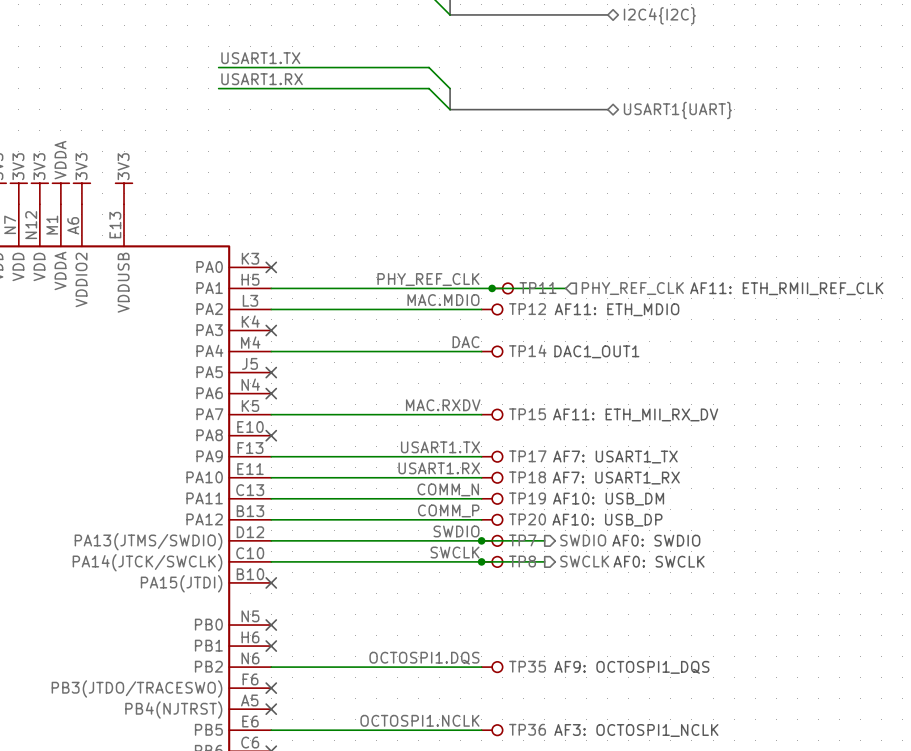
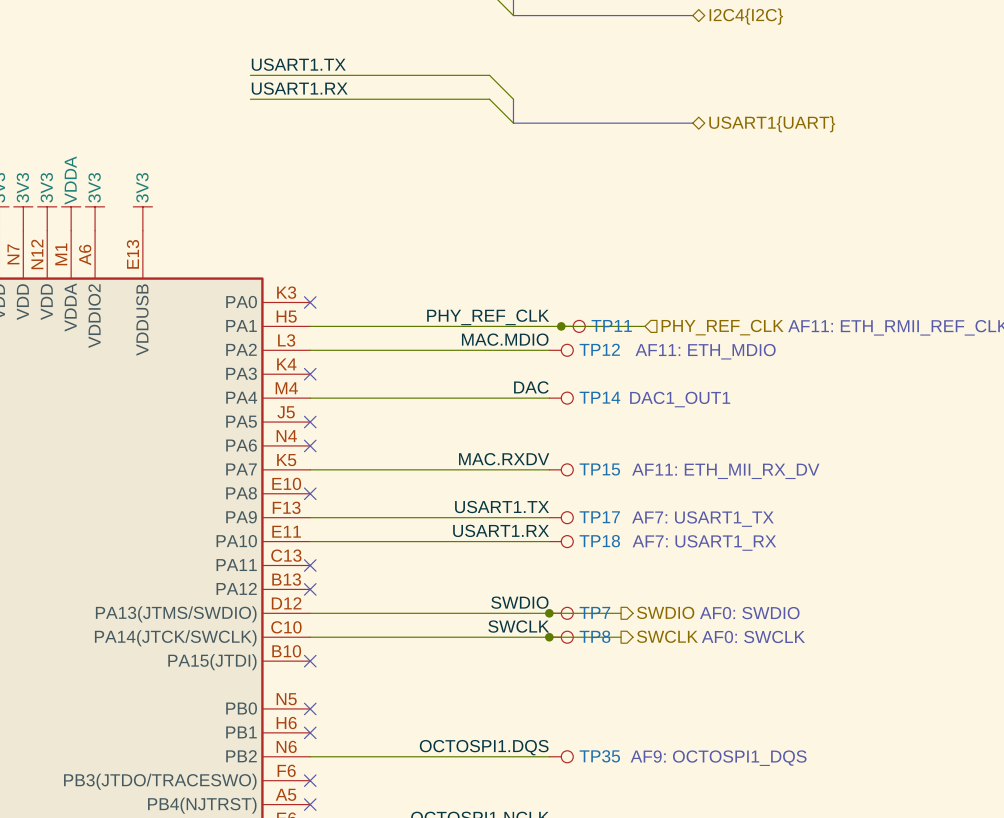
label: COMM_N (448, 489) -> none
wire: (271, 498) (481, 498) -> none
no-connect mark: none -> (310, 565)
TP19: (492, 498) -> none
text: AF10: USB_DM (608, 499) -> none
label: COMM_P (448, 510) -> none
wire: (271, 519) (481, 519) -> none
no-connect mark: none -> (310, 589)
TP20: (492, 519) -> none
text: AF10: USB_DP (607, 520) -> none

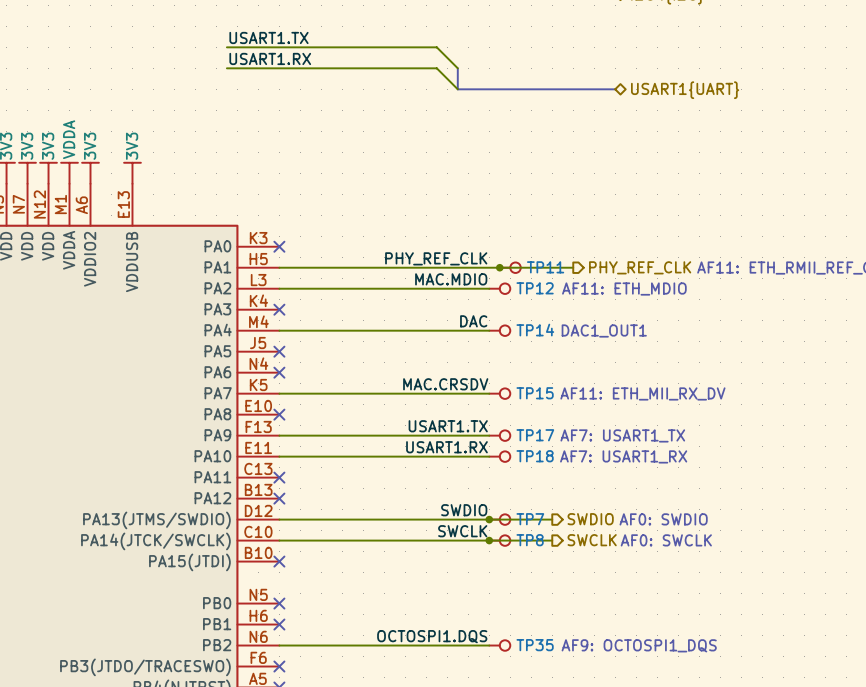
hierarchical label shape: input (722, 327) -> output (640, 267)
label: MAC.RXDV (504, 459) -> MAC.CRSDV (445, 384)

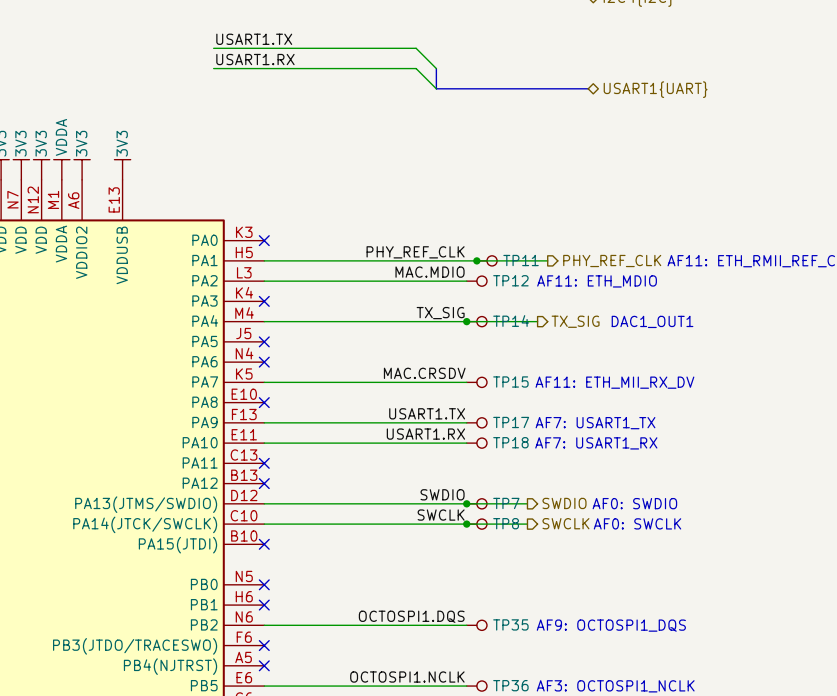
label: DAC (473, 321) -> TX_SIG (440, 313)
wire: none -> (466, 321) (537, 321)
junction: none -> (466, 321)
hierarchical label: none -> TX_SIG (575, 321)
text position: DAC1_OUT1 (604, 330) -> DAC1_OUT1 (652, 321)

